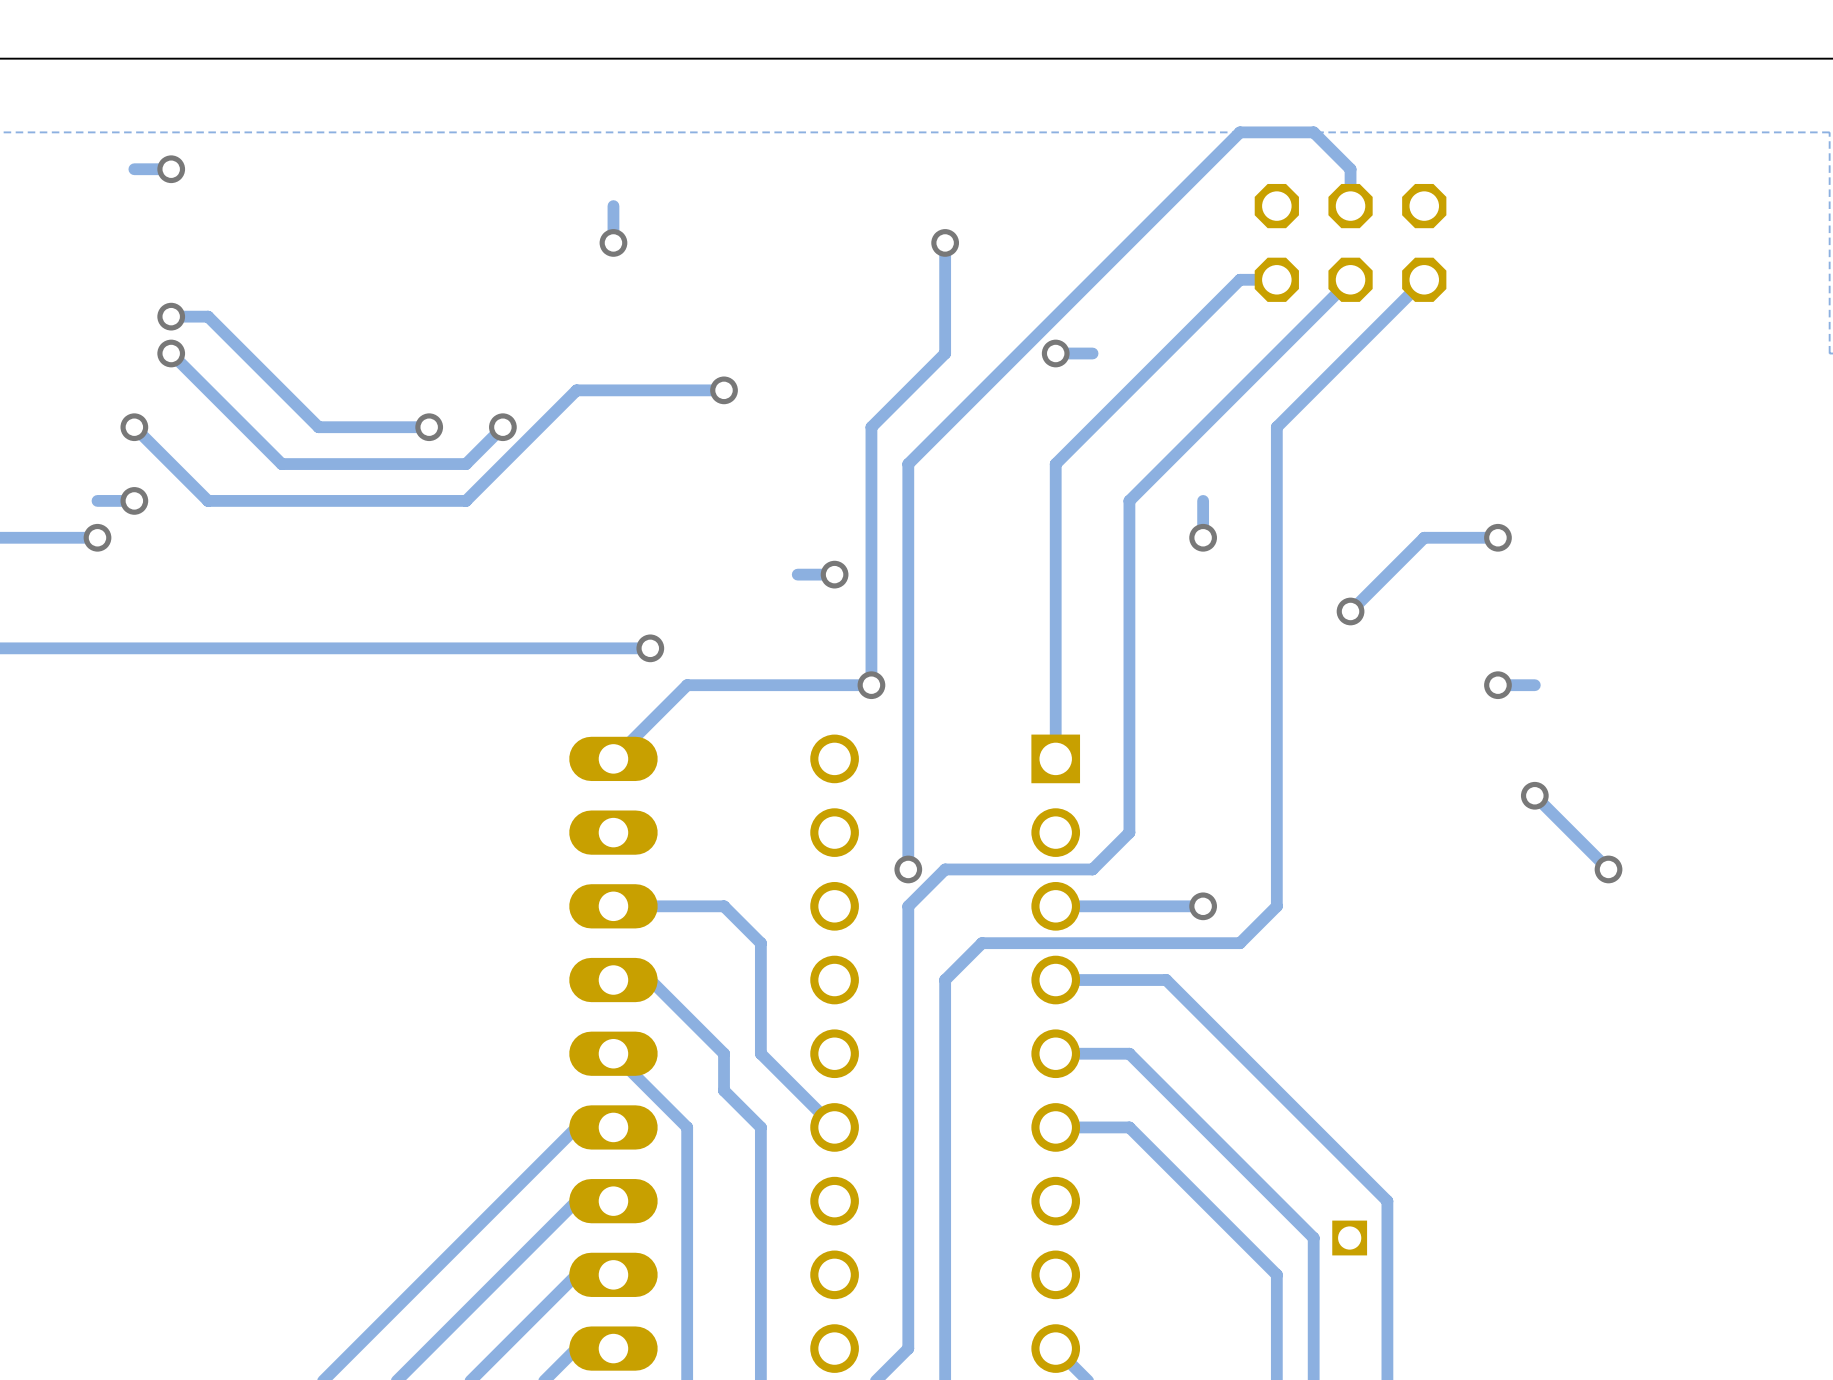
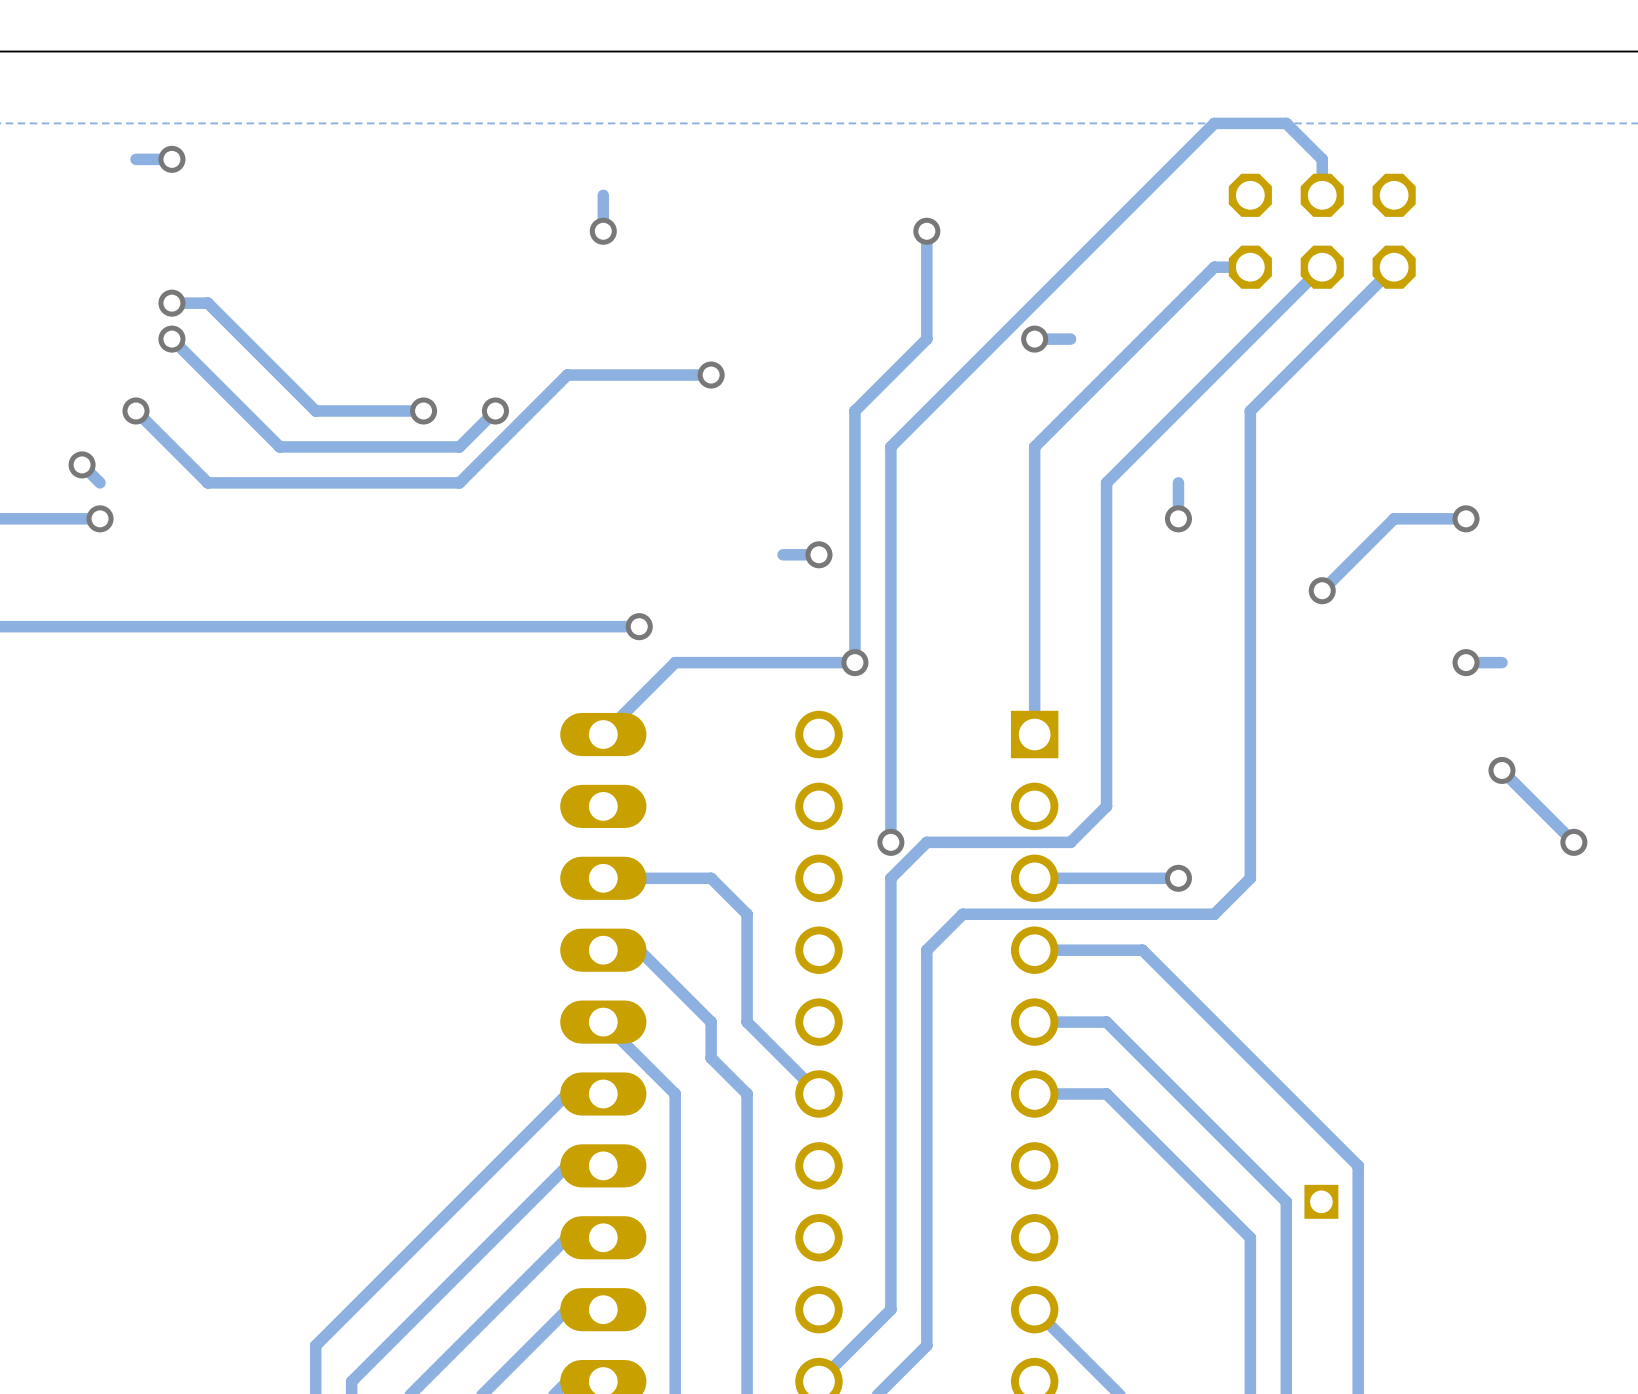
track: (134, 500) (97, 500) -> (82, 464) (100, 482)
via position: (134, 500) -> (82, 464)

